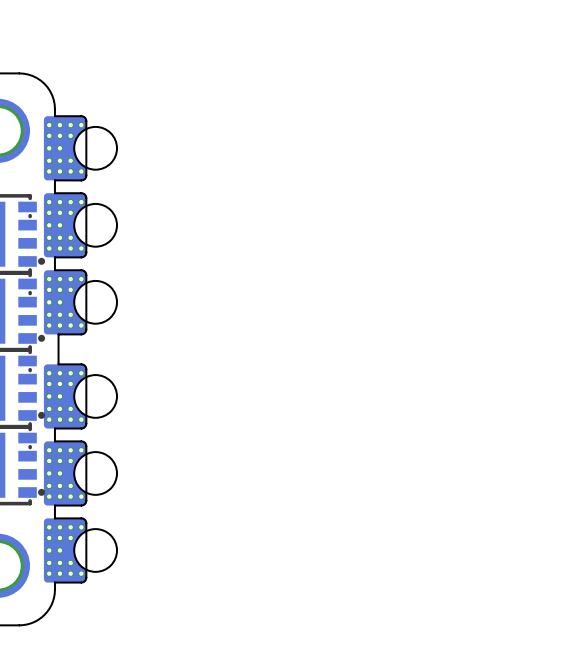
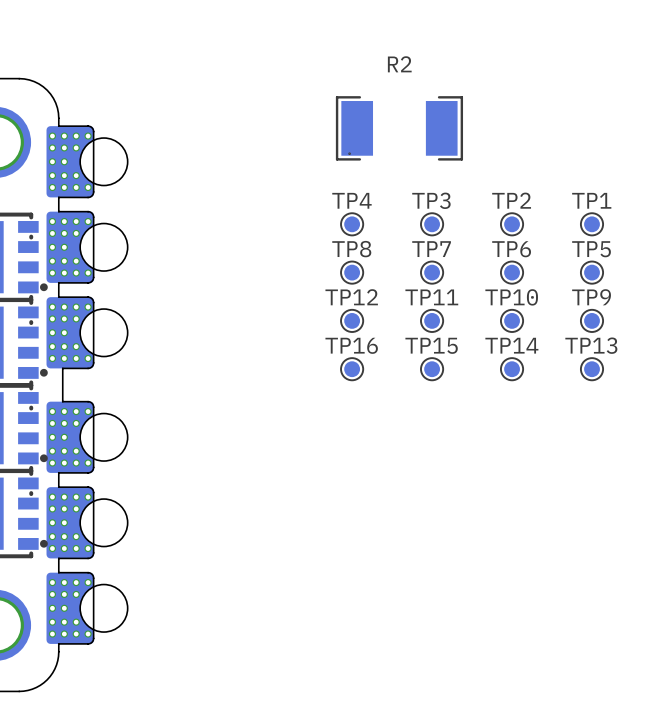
R2: none -> (399, 128)
TP4: none -> (352, 224)
TP3: none -> (432, 224)
TP2: none -> (512, 224)
TP1: none -> (592, 224)
TP8: none -> (352, 272)
TP7: none -> (432, 272)
TP6: none -> (512, 272)
TP5: none -> (592, 272)
TP12: none -> (352, 320)
TP11: none -> (432, 320)
TP10: none -> (512, 320)
TP9: none -> (592, 320)
TP16: none -> (352, 369)
TP15: none -> (432, 369)
TP14: none -> (512, 369)
TP13: none -> (592, 369)

